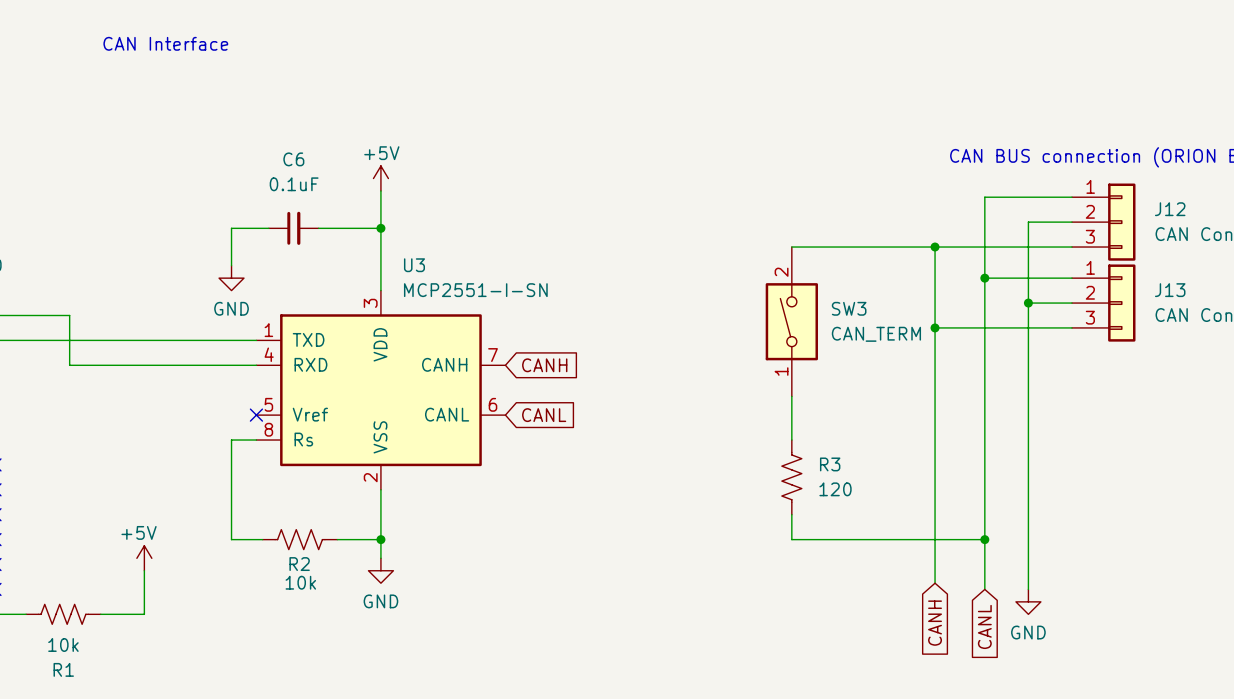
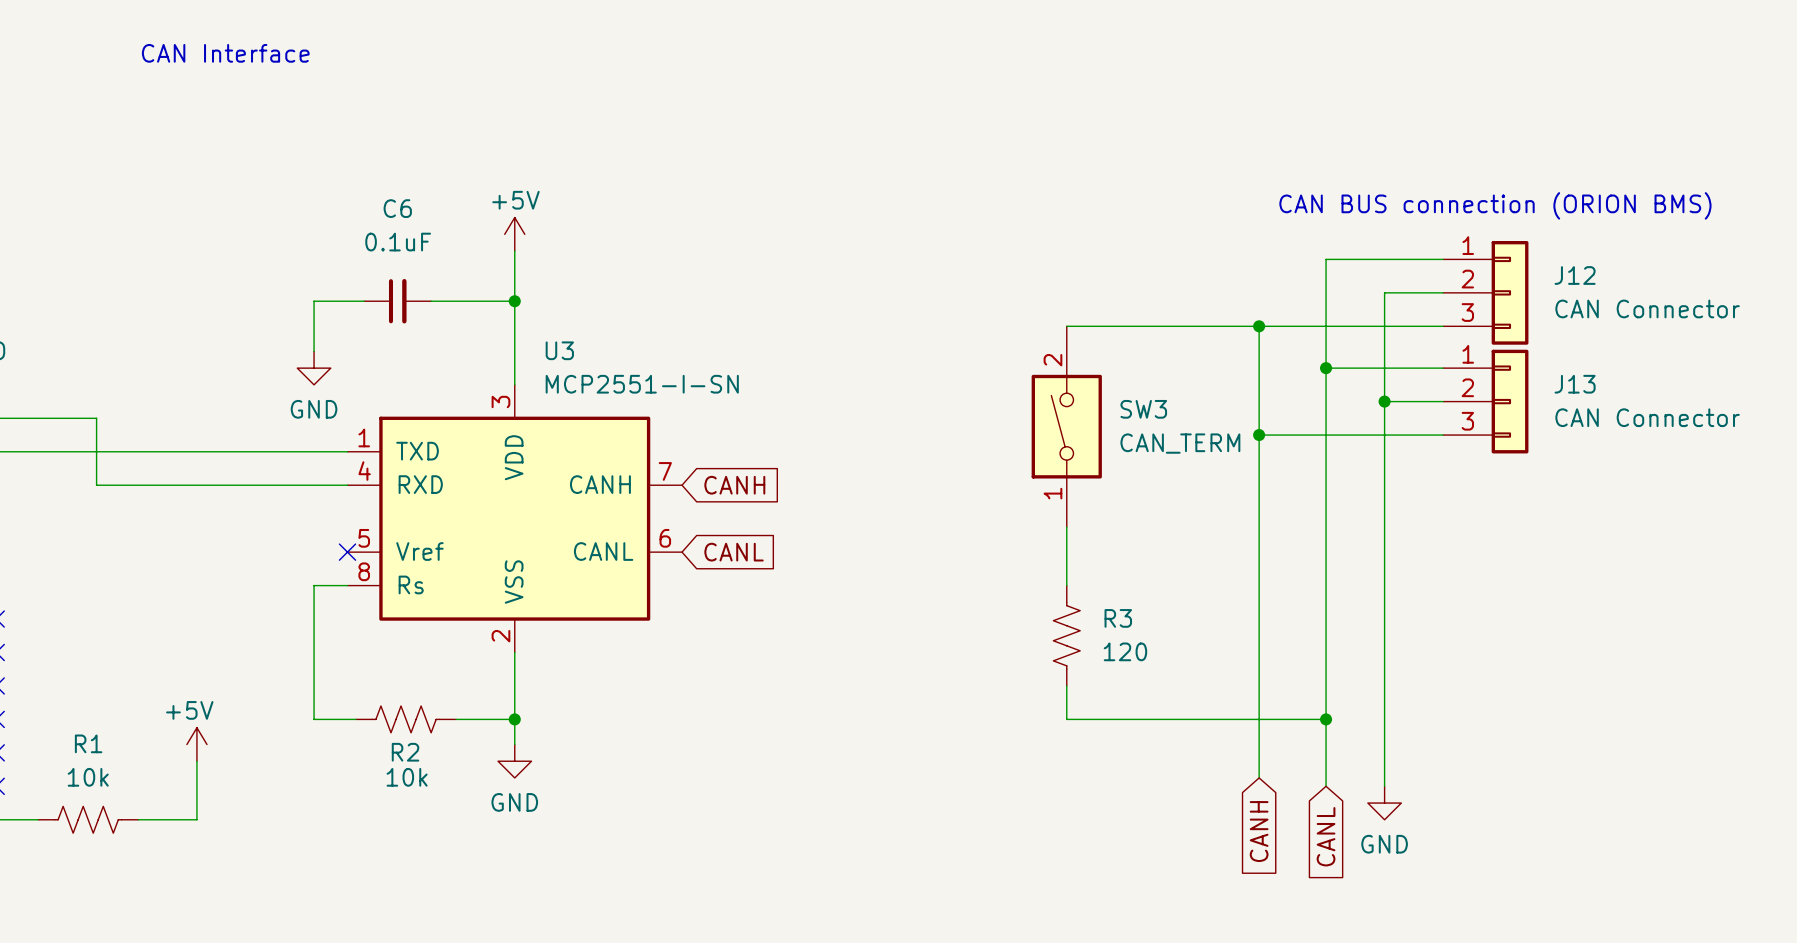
R1 value position: 10k (63, 644) -> 10k (88, 777)
R1 name position: R1 (63, 669) -> R1 (88, 743)

